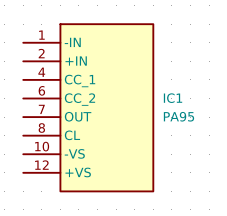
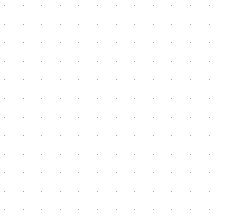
IC1: PA95 (88, 107) -> none

